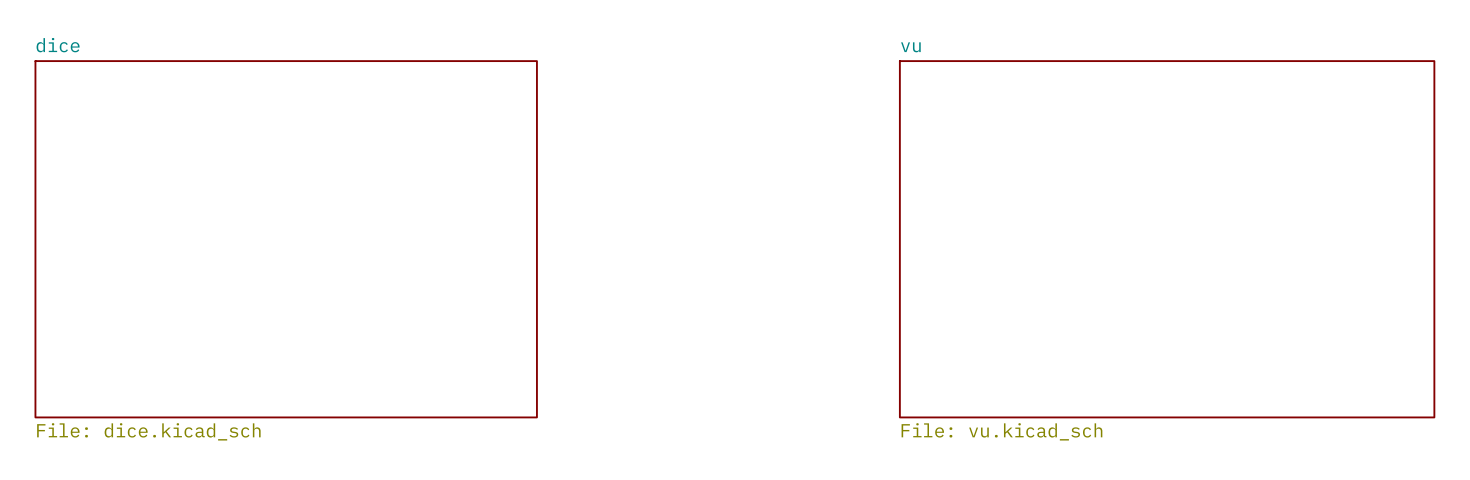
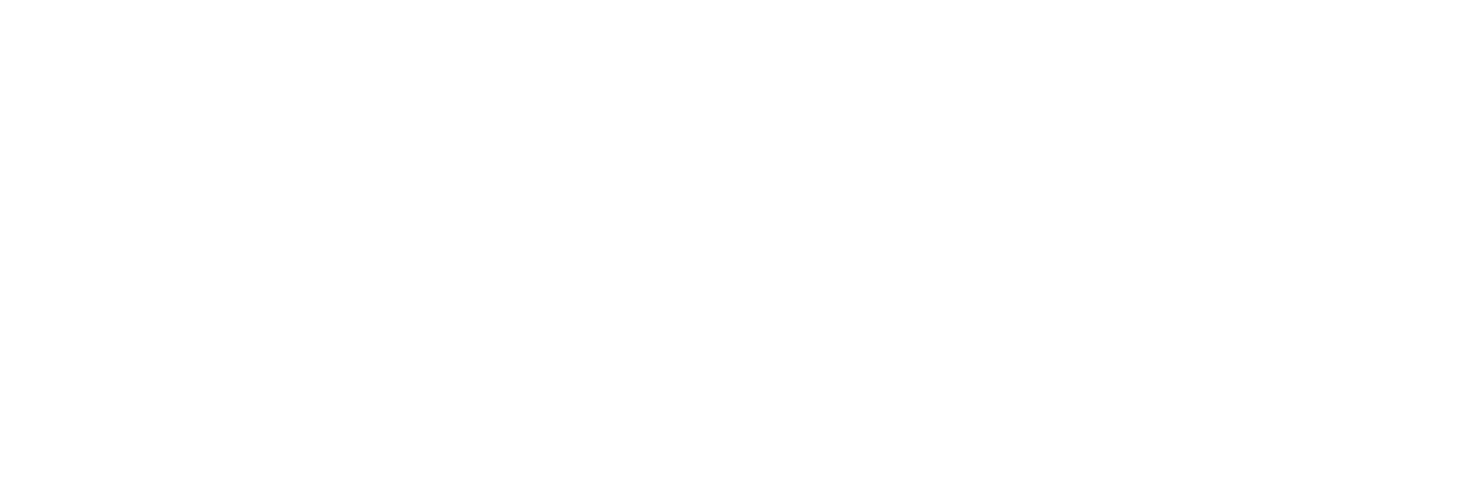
sheet dice: File: dice.kicad_sch (286, 239) -> none
sheet vu: File: vu.kicad_sch (1167, 239) -> none

